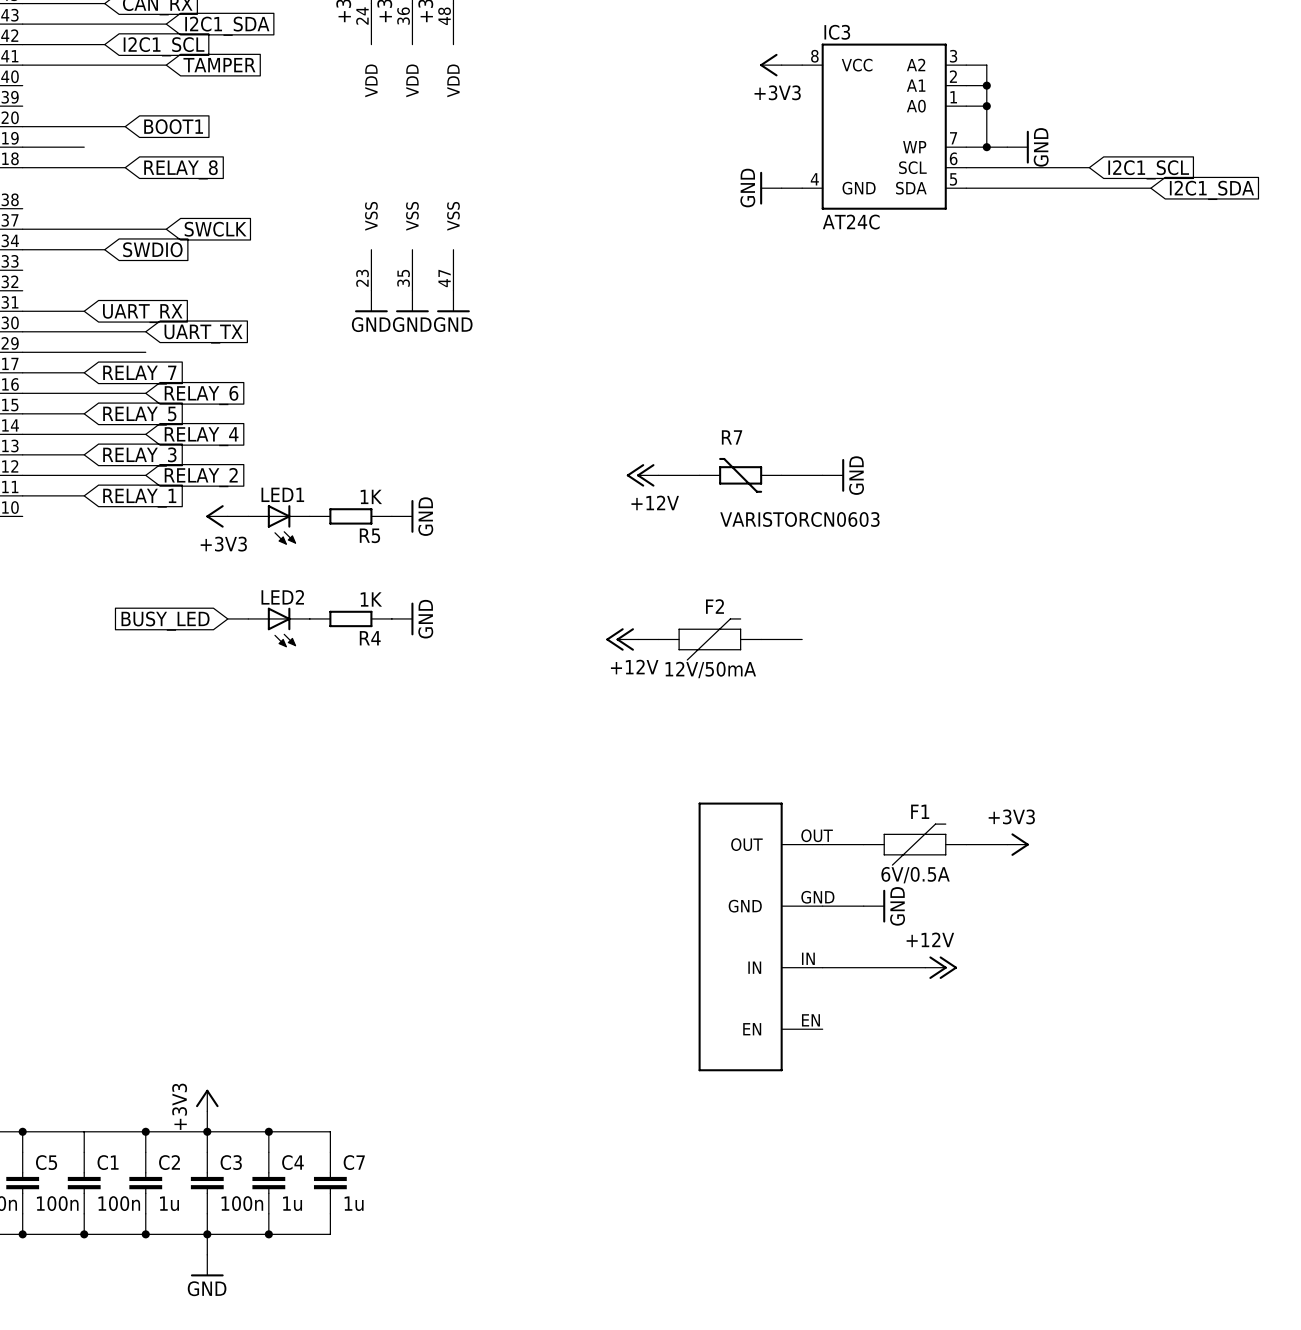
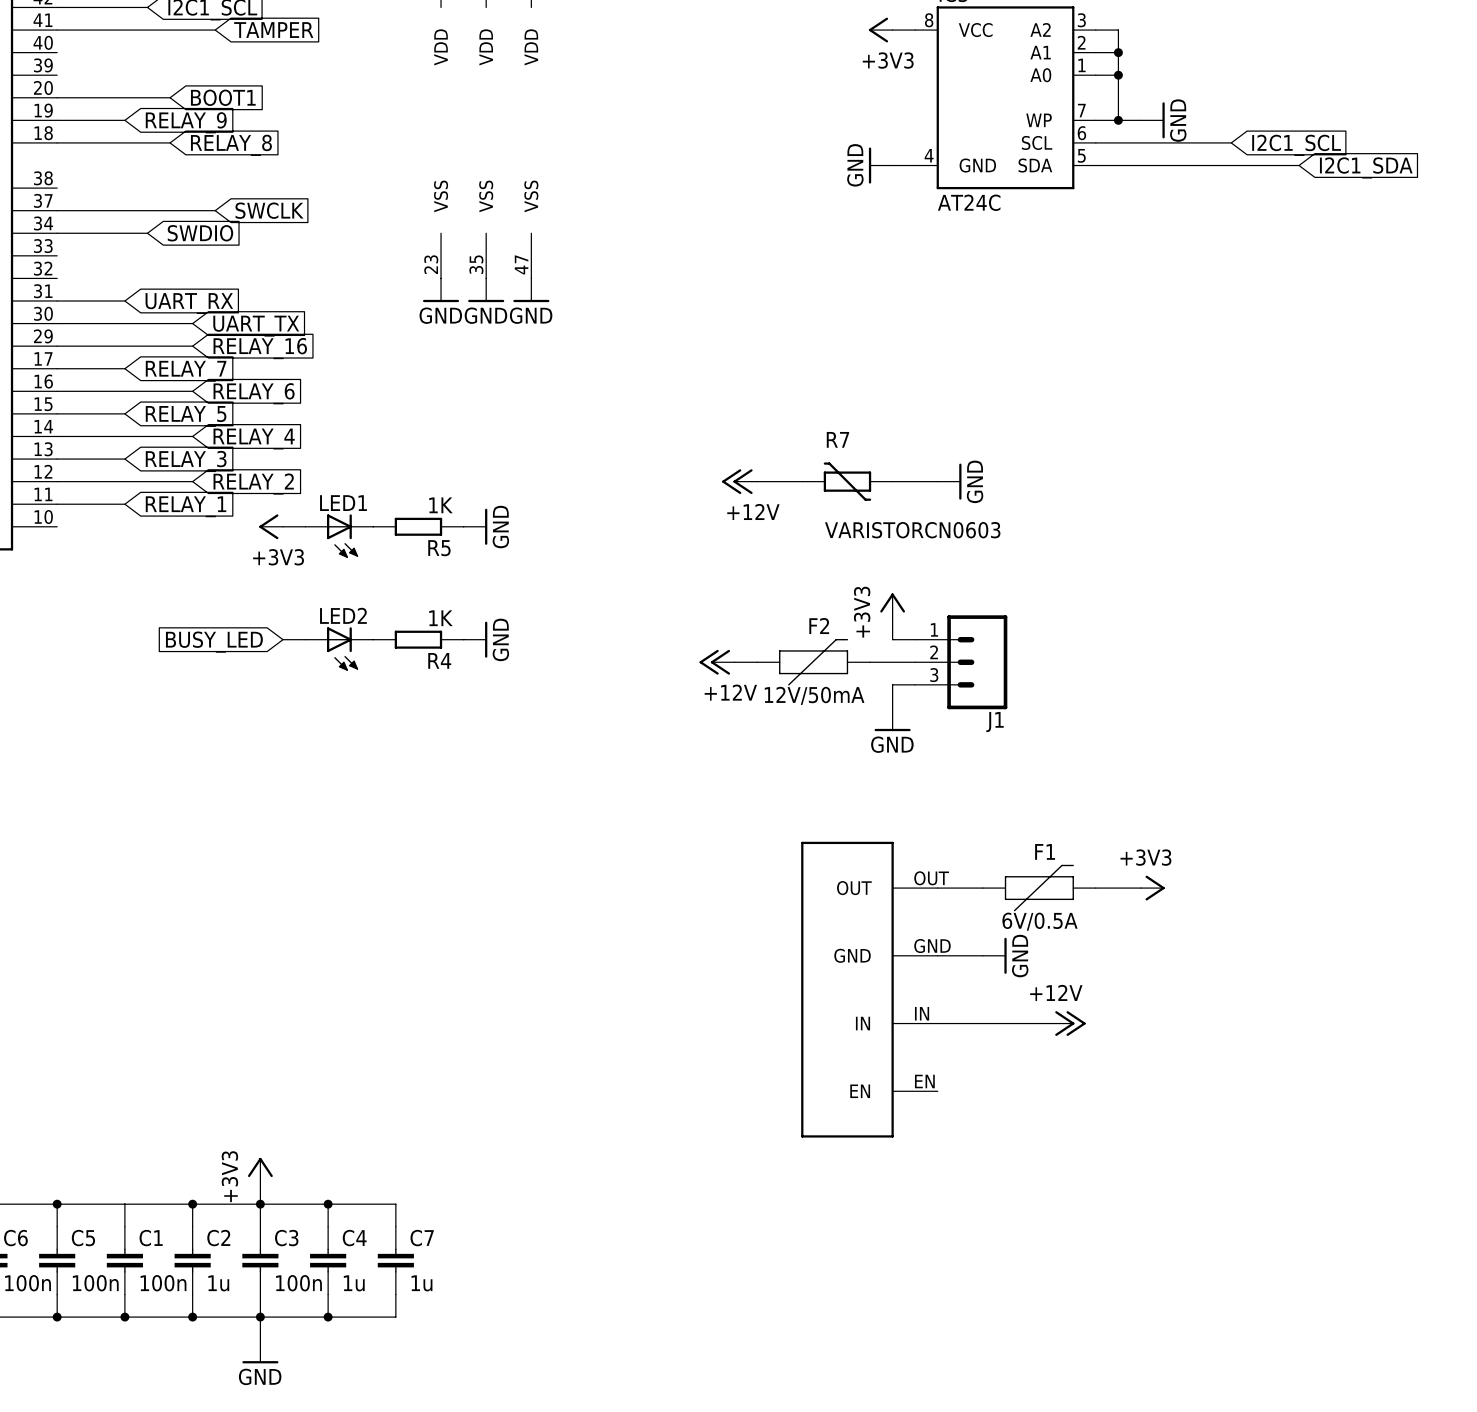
global label: none -> RELAY_9 (186, 122)
global label: none -> RELAY_16 (260, 348)
power symbol: none -> +3V3 (892, 605)
wire: none -> (892, 617) (892, 639) (915, 639)
J1: none -> (961, 662)
wire: none -> (915, 684) (892, 684) (892, 707)
power symbol: none -> GND (892, 719)

